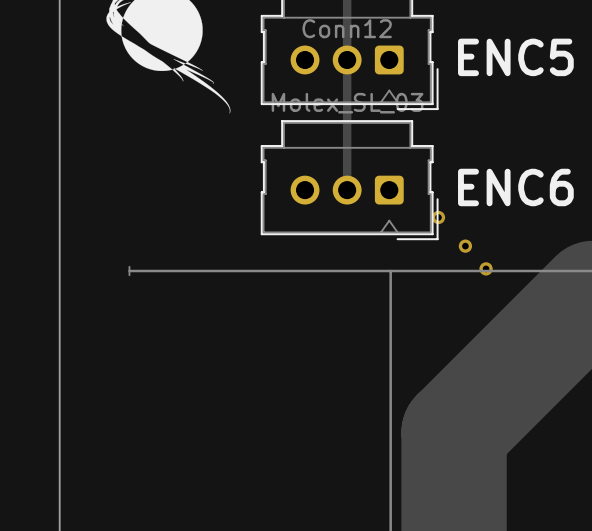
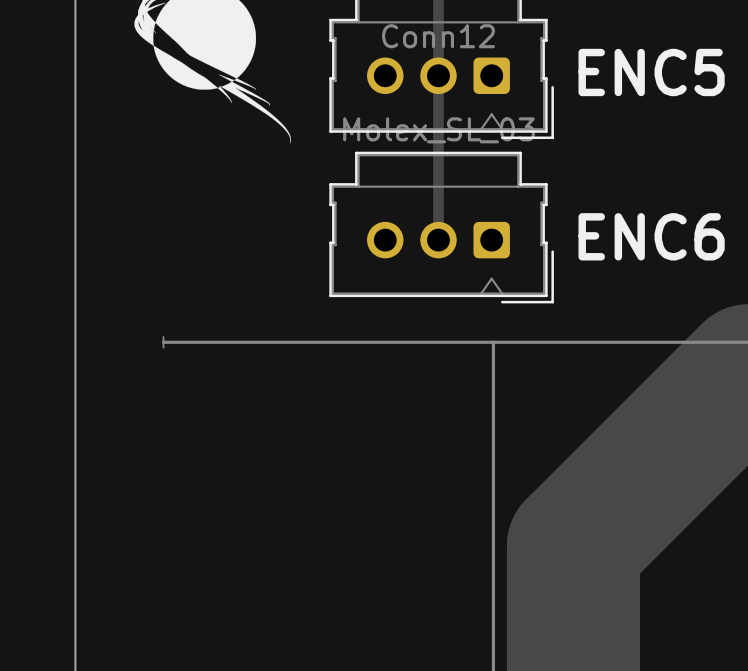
via: (438, 217) -> none
via: (465, 246) -> none
via: (486, 268) -> none

